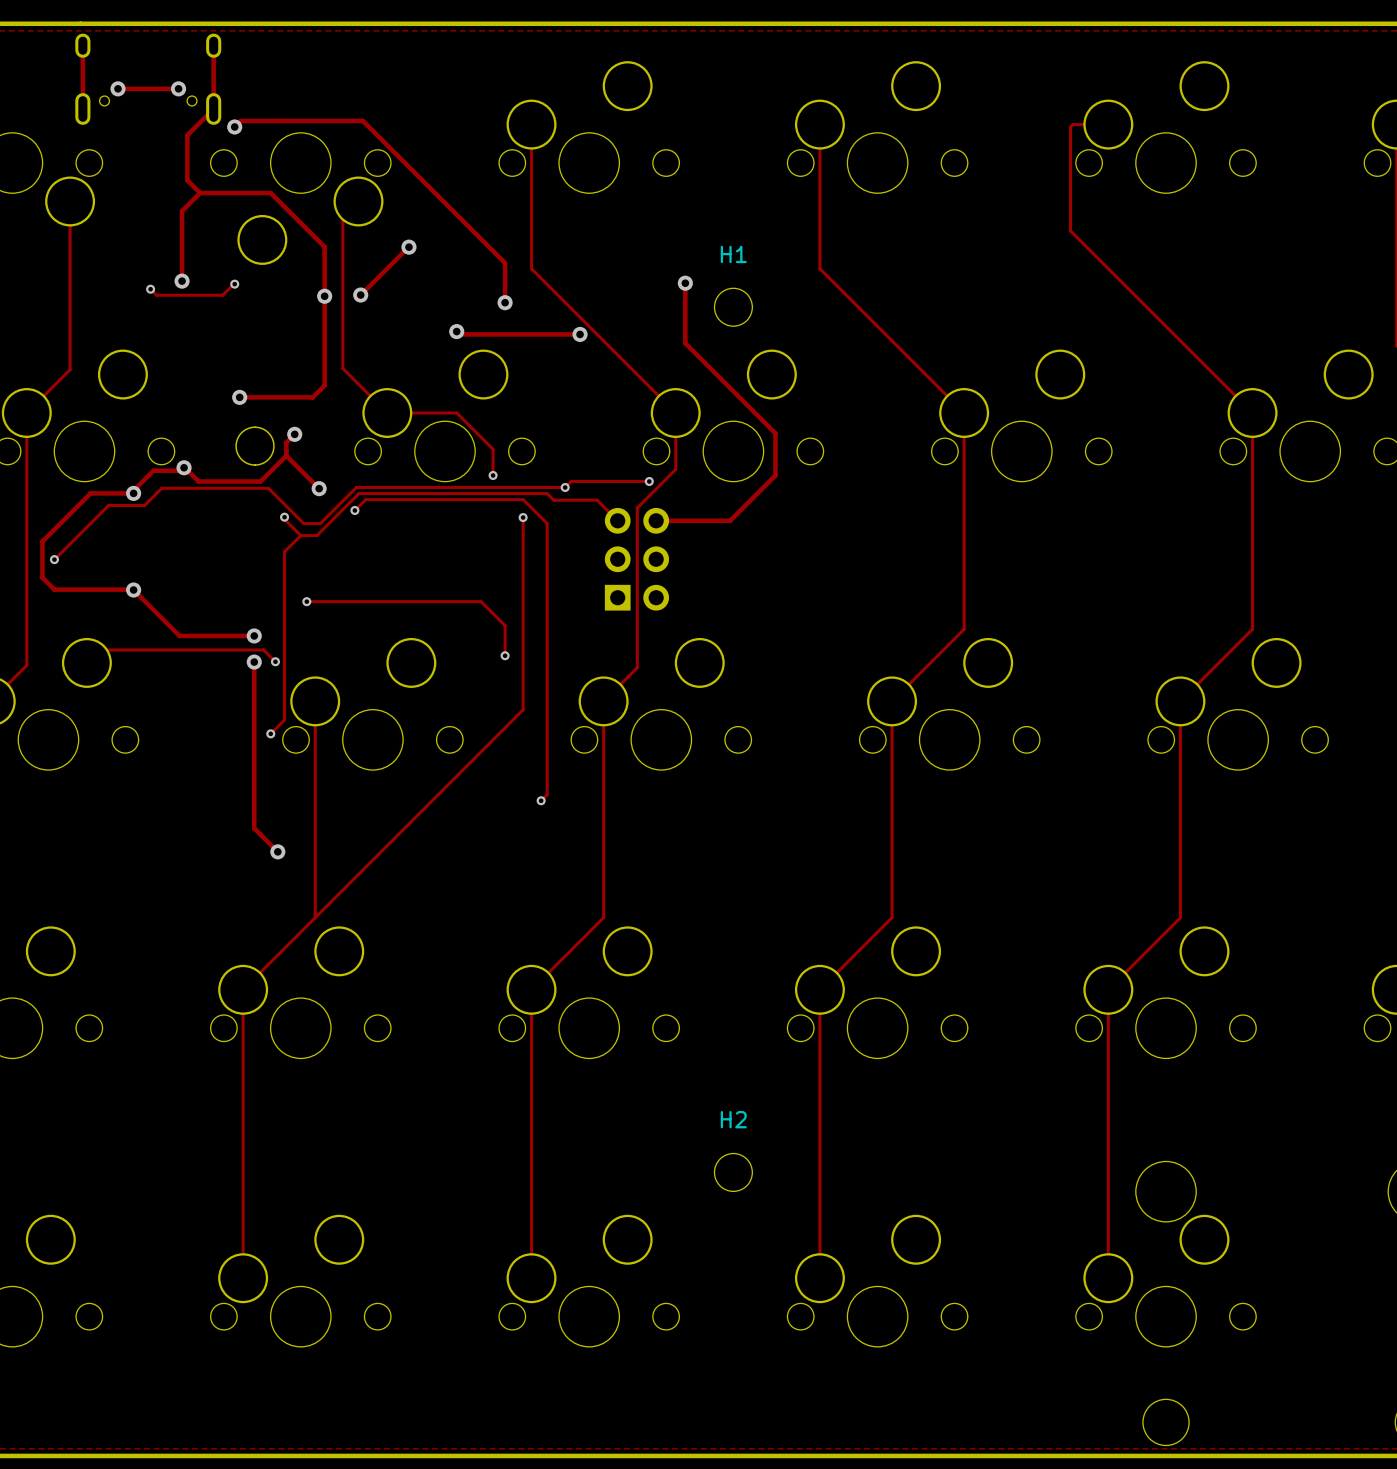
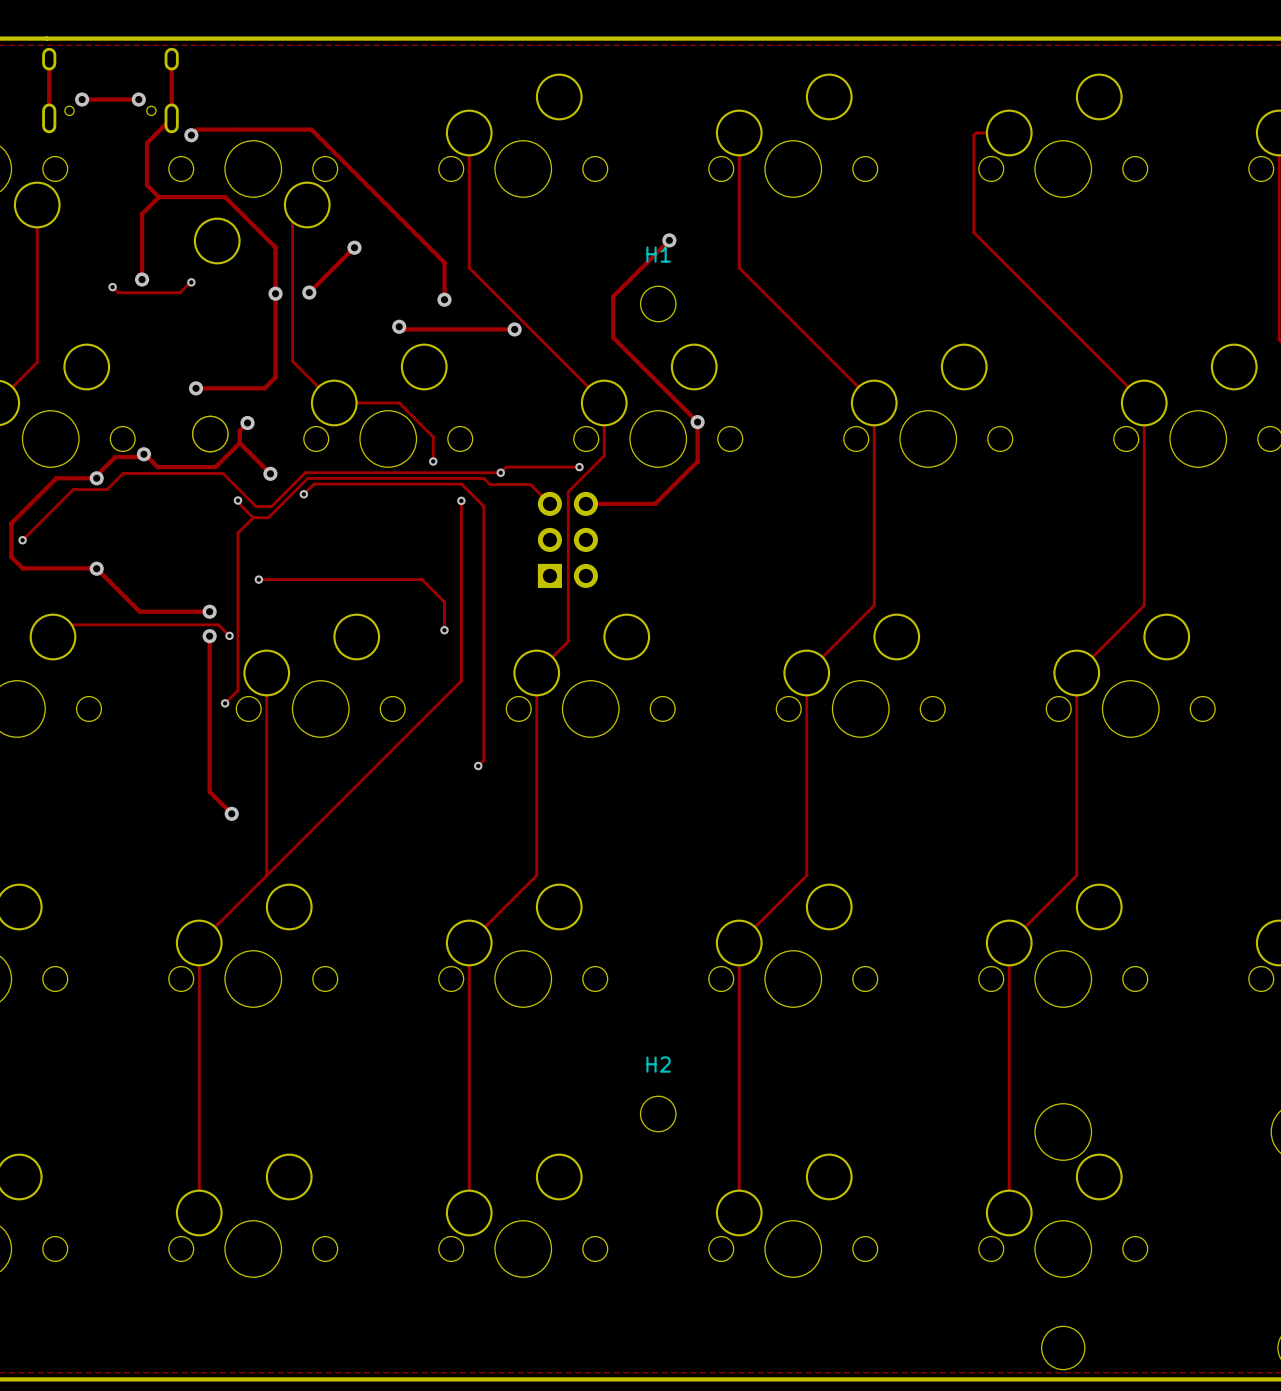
track: (685, 283) (685, 299) -> (669, 240) (613, 296)
via position: (685, 283) -> (669, 240)
via: none -> (697, 422)

